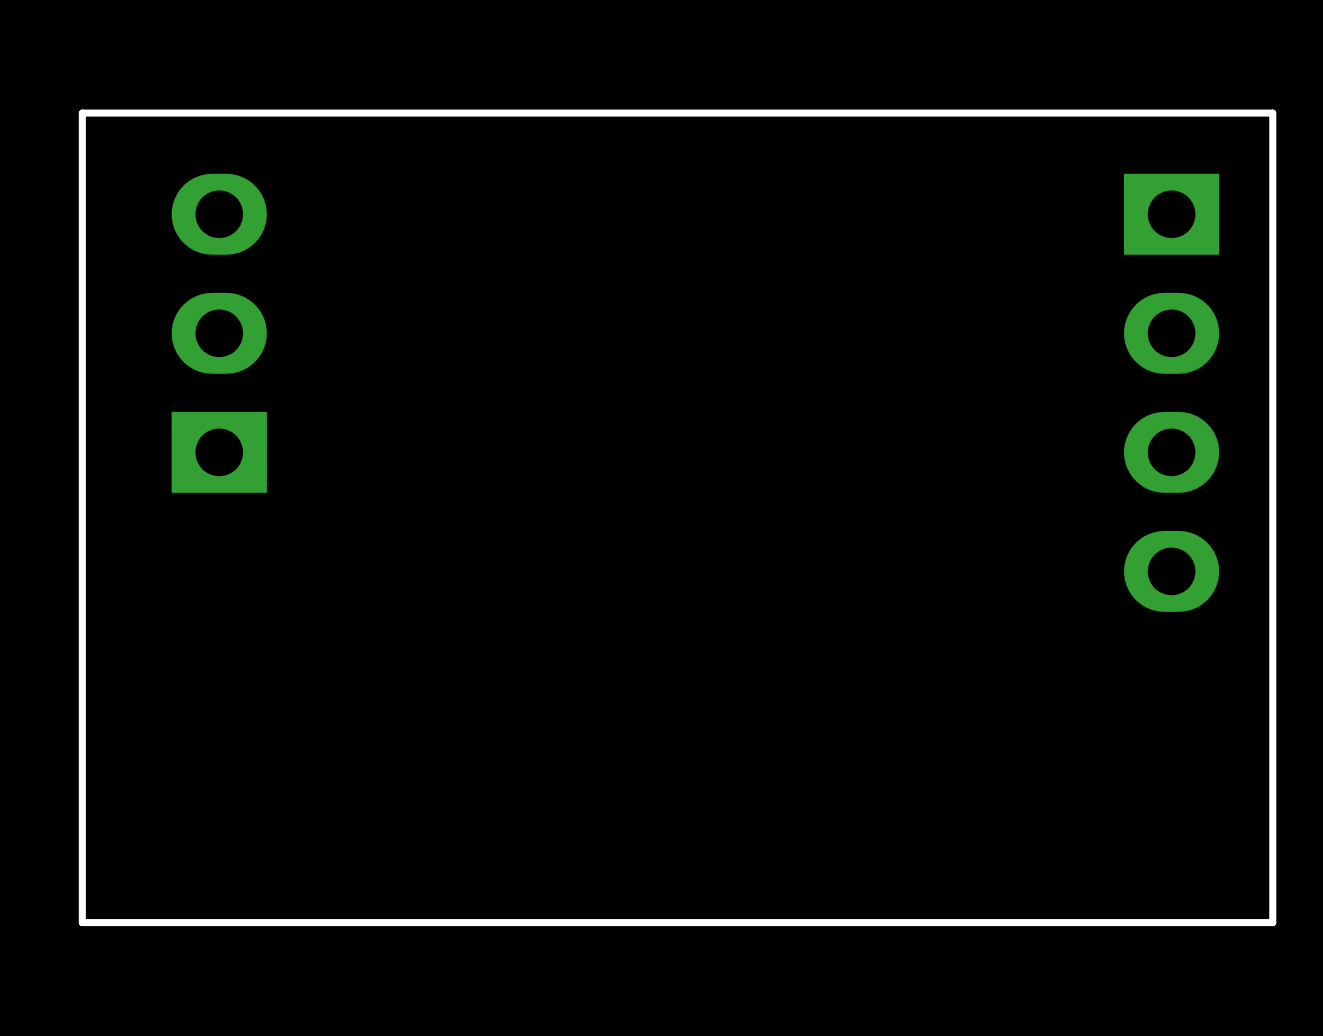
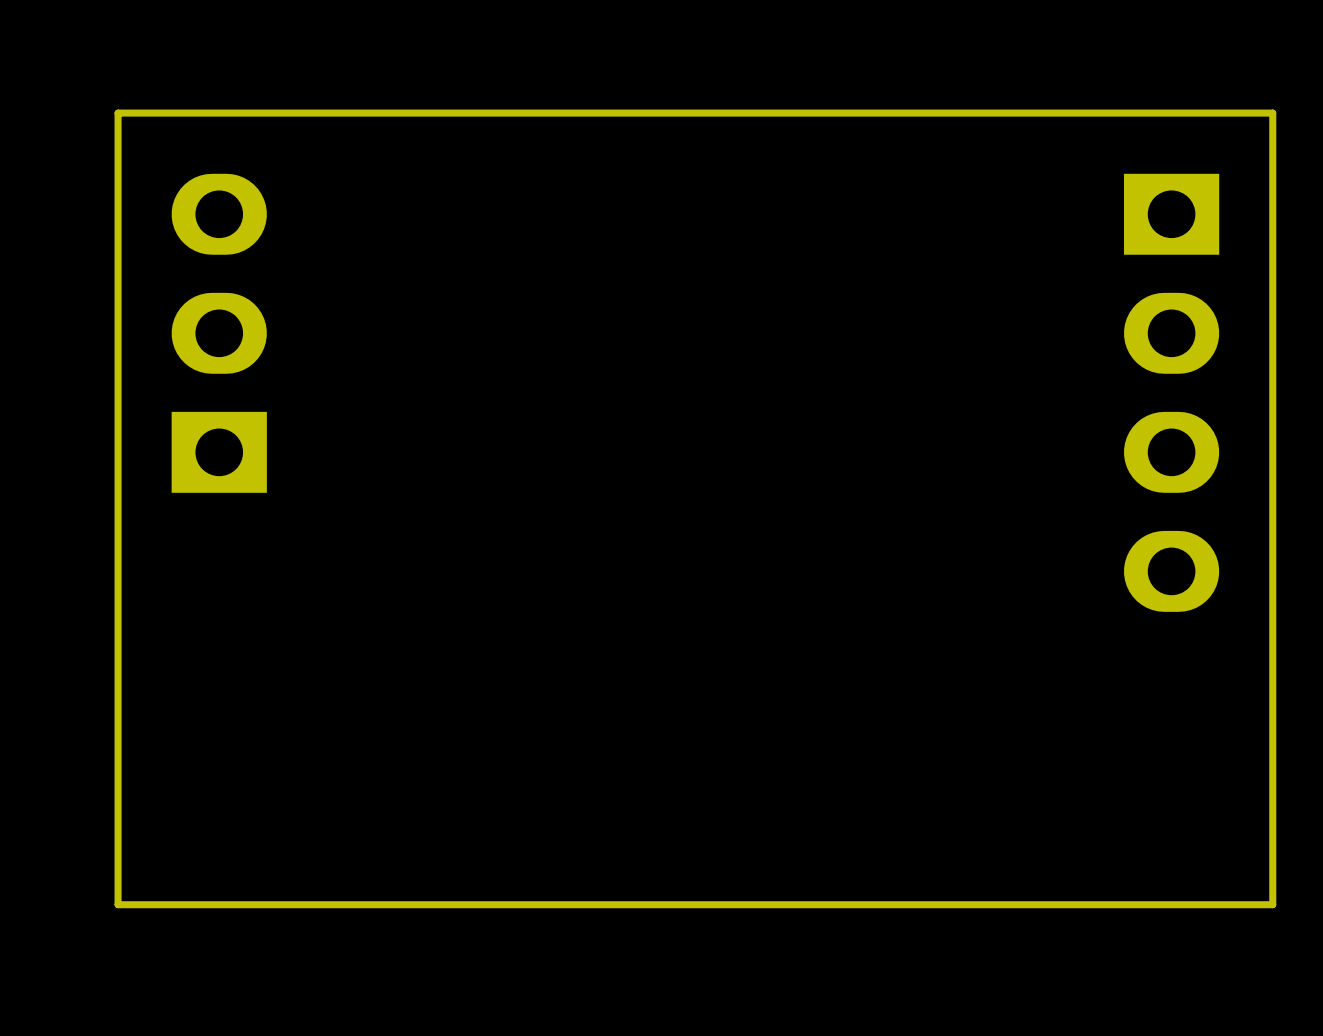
board edge: (118, 113) (82, 113) (82, 922) (1272, 922) (1272, 904) -> (118, 113) (118, 904) (1272, 904)

